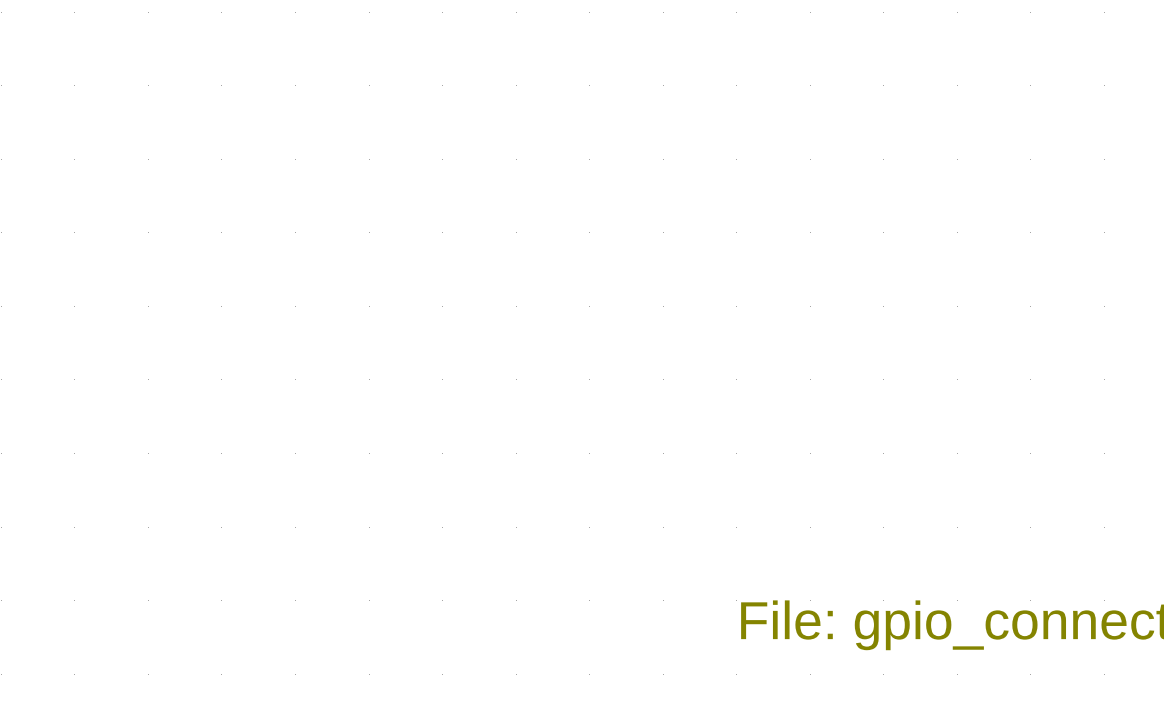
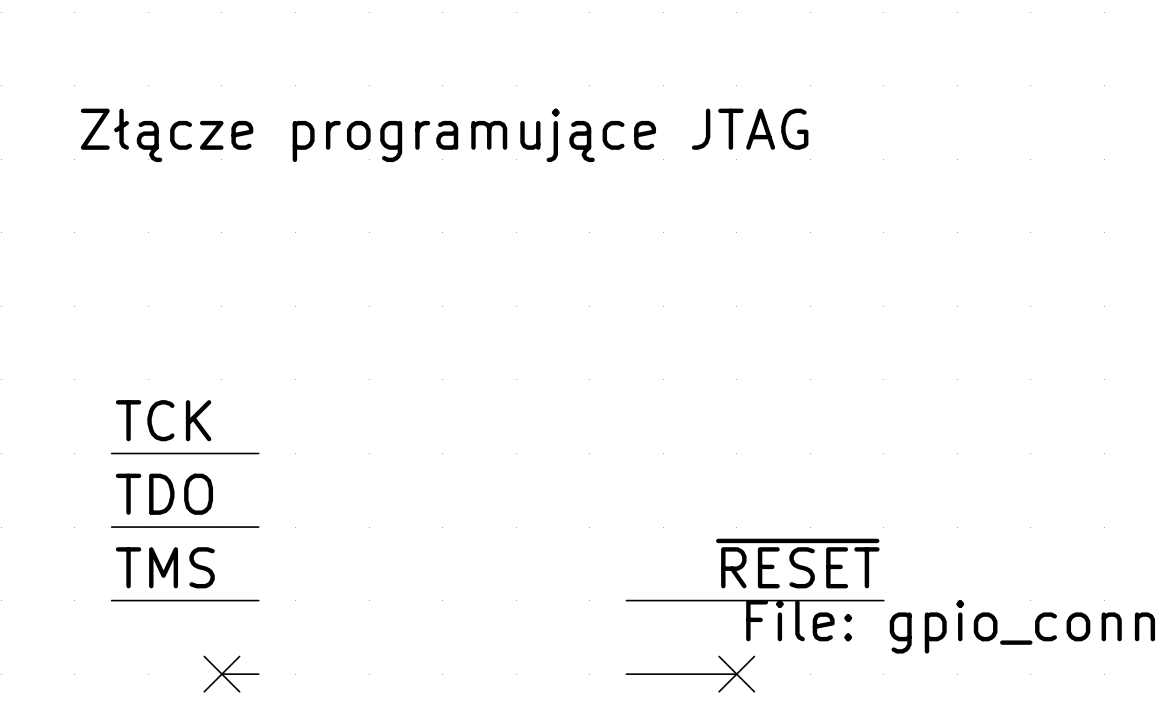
text: none -> Złącze programujące JTAG (444, 135)
label: none -> TCK (163, 420)
wire: none -> (111, 453) (258, 453)
label: none -> TDO (164, 494)
wire: none -> (111, 527) (258, 527)
label: none -> ~{RESET} (797, 563)
label: none -> TMS (165, 567)
wire: none -> (111, 600) (258, 600)
wire: none -> (626, 600) (883, 600)
wire: none -> (221, 674) (258, 674)
no-connect mark: none -> (221, 674)
wire: none -> (626, 674) (736, 674)
no-connect mark: none -> (736, 674)

